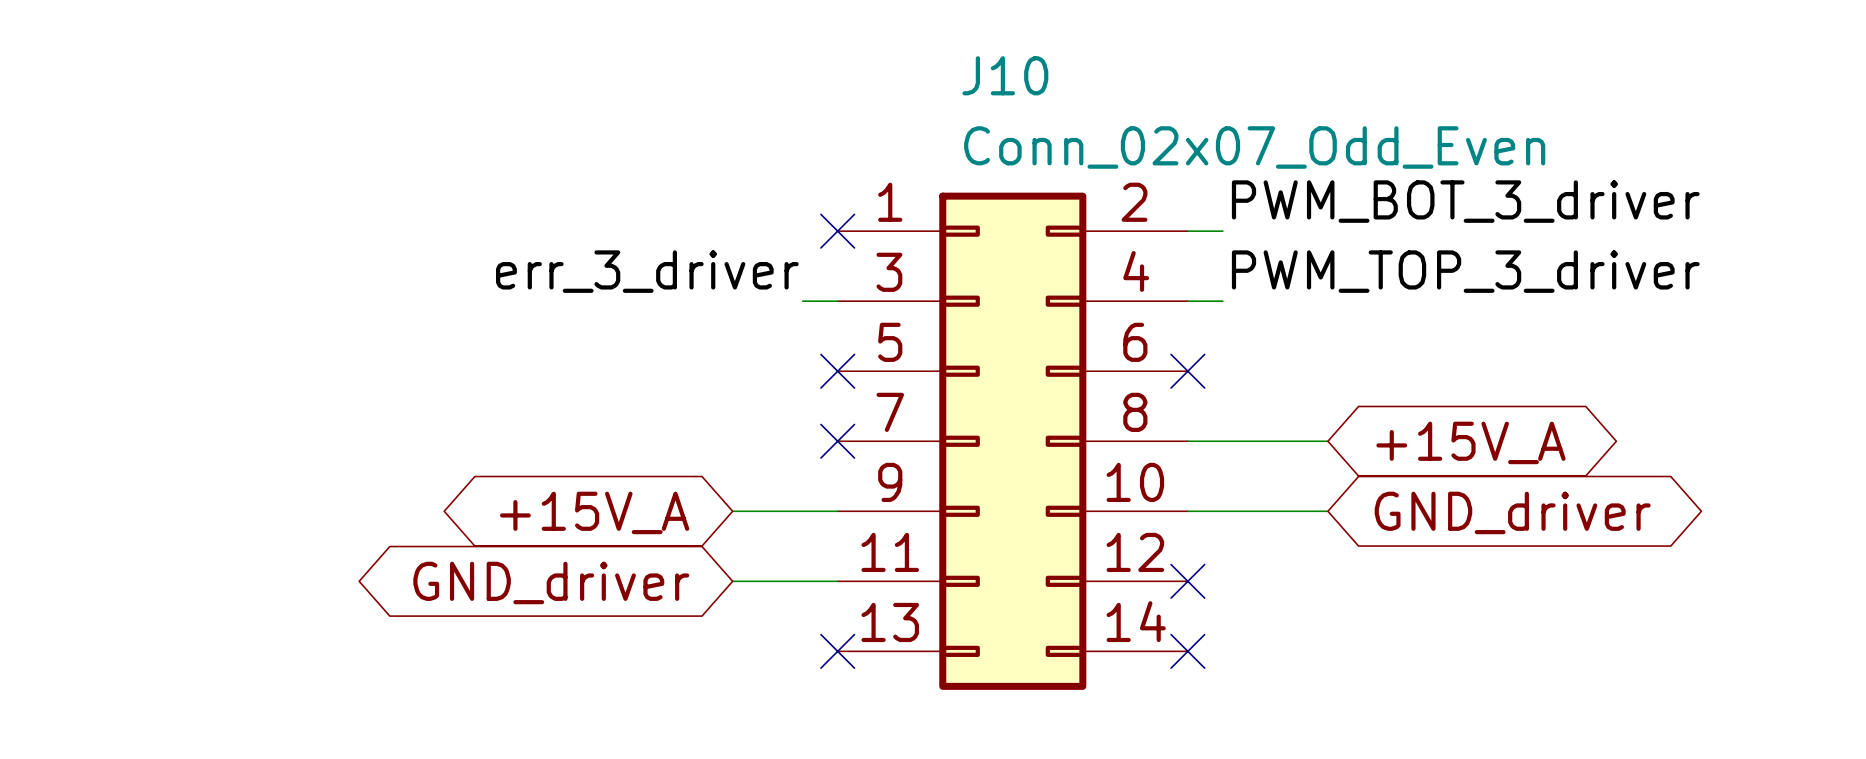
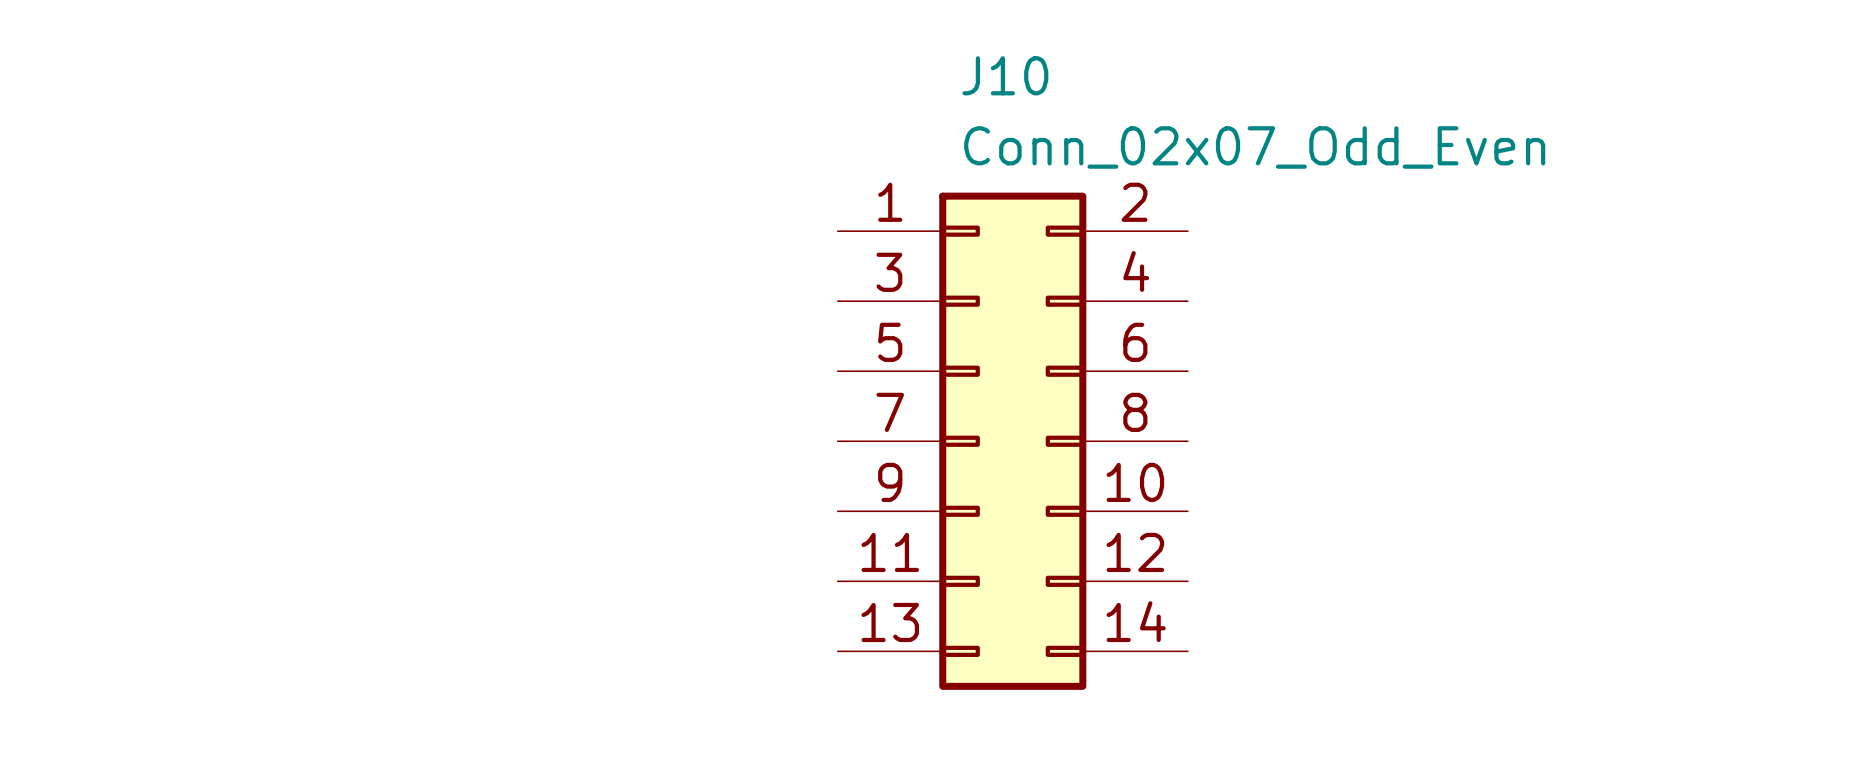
label: PWM_BOT_3_driver (1465, 201) -> none
no-connect mark: (837, 231) -> none
wire: (1187, 231) (1222, 231) -> none
label: err_3_driver (647, 271) -> none
label: PWM_TOP_3_driver (1465, 271) -> none
wire: (802, 301) (837, 301) -> none
wire: (1187, 301) (1222, 301) -> none
no-connect mark: (837, 371) -> none
no-connect mark: (1187, 371) -> none
no-connect mark: (837, 441) -> none
wire: (1187, 441) (1327, 441) -> none
global label: +15V_A (1470, 442) -> none
wire: (732, 511) (837, 511) -> none
wire: (1187, 511) (1327, 511) -> none
global label: +15V_A (594, 512) -> none
global label: GND_driver (1512, 512) -> none
wire: (732, 581) (837, 581) -> none
no-connect mark: (1187, 581) -> none
global label: GND_driver (551, 582) -> none
no-connect mark: (837, 651) -> none
no-connect mark: (1187, 651) -> none

